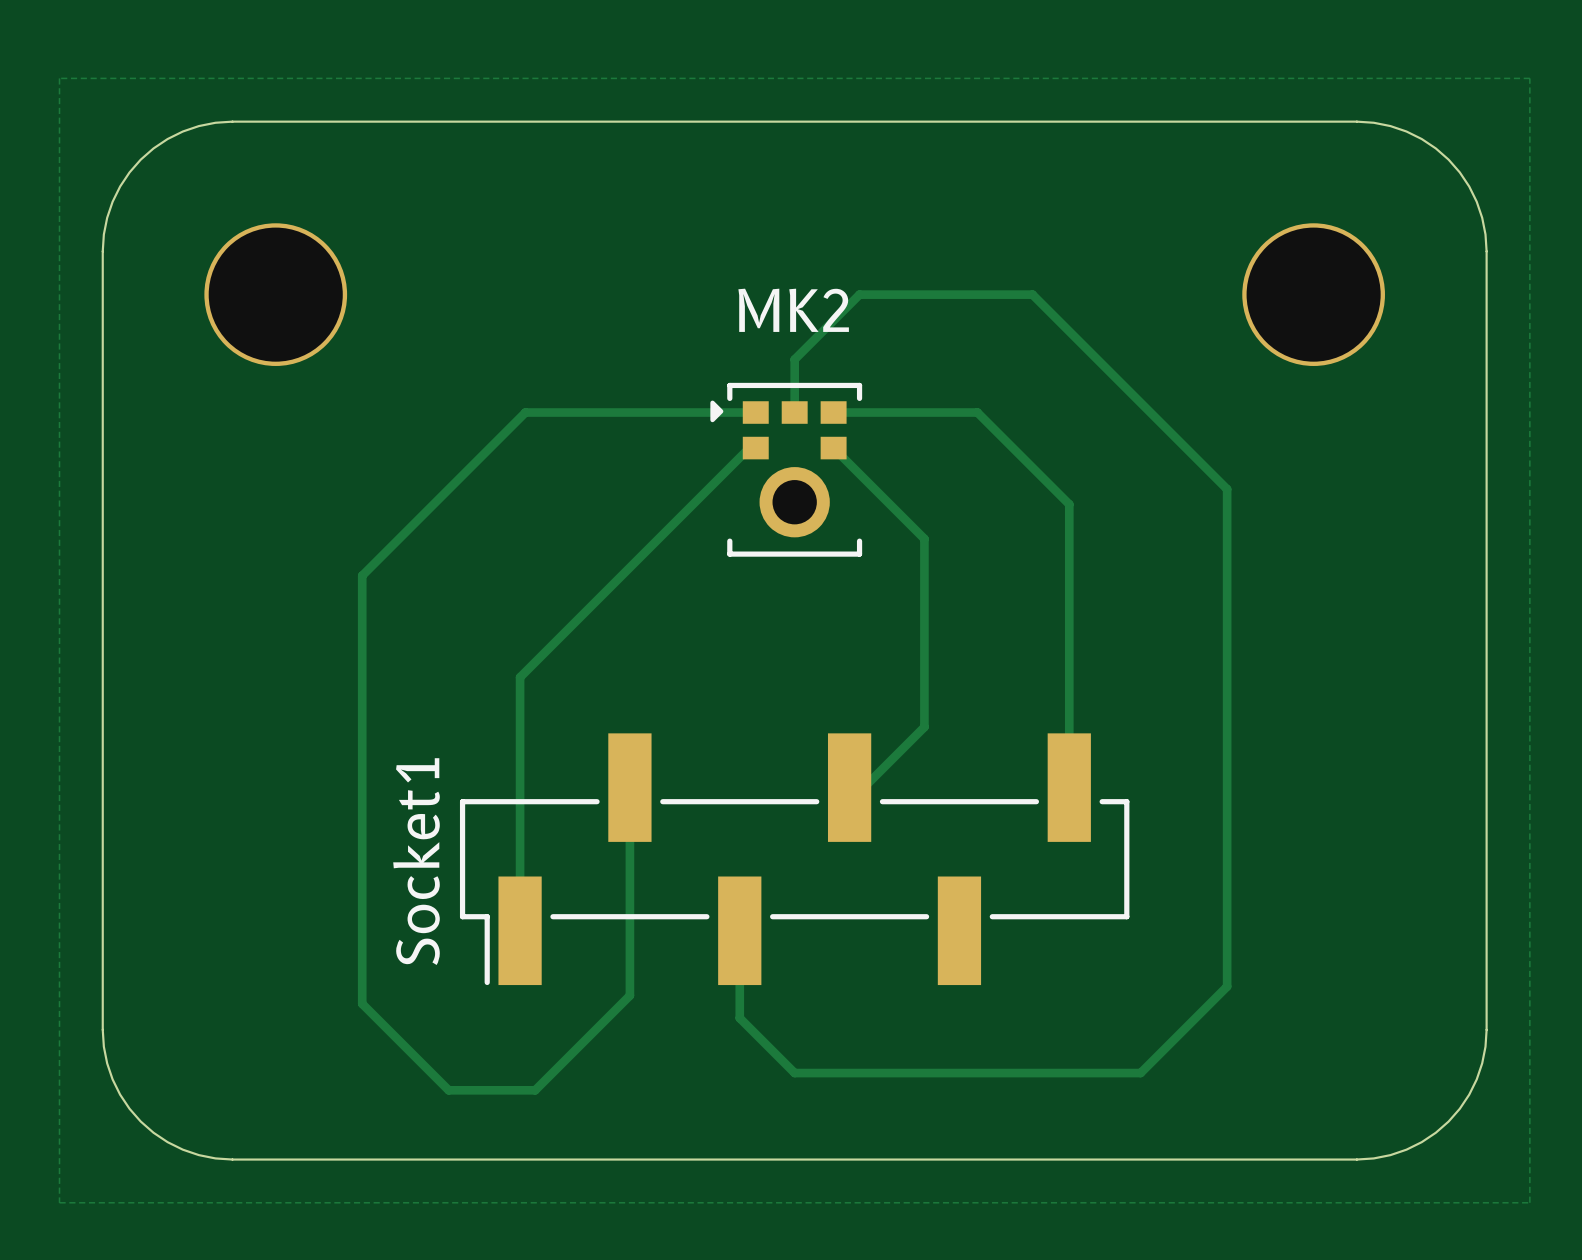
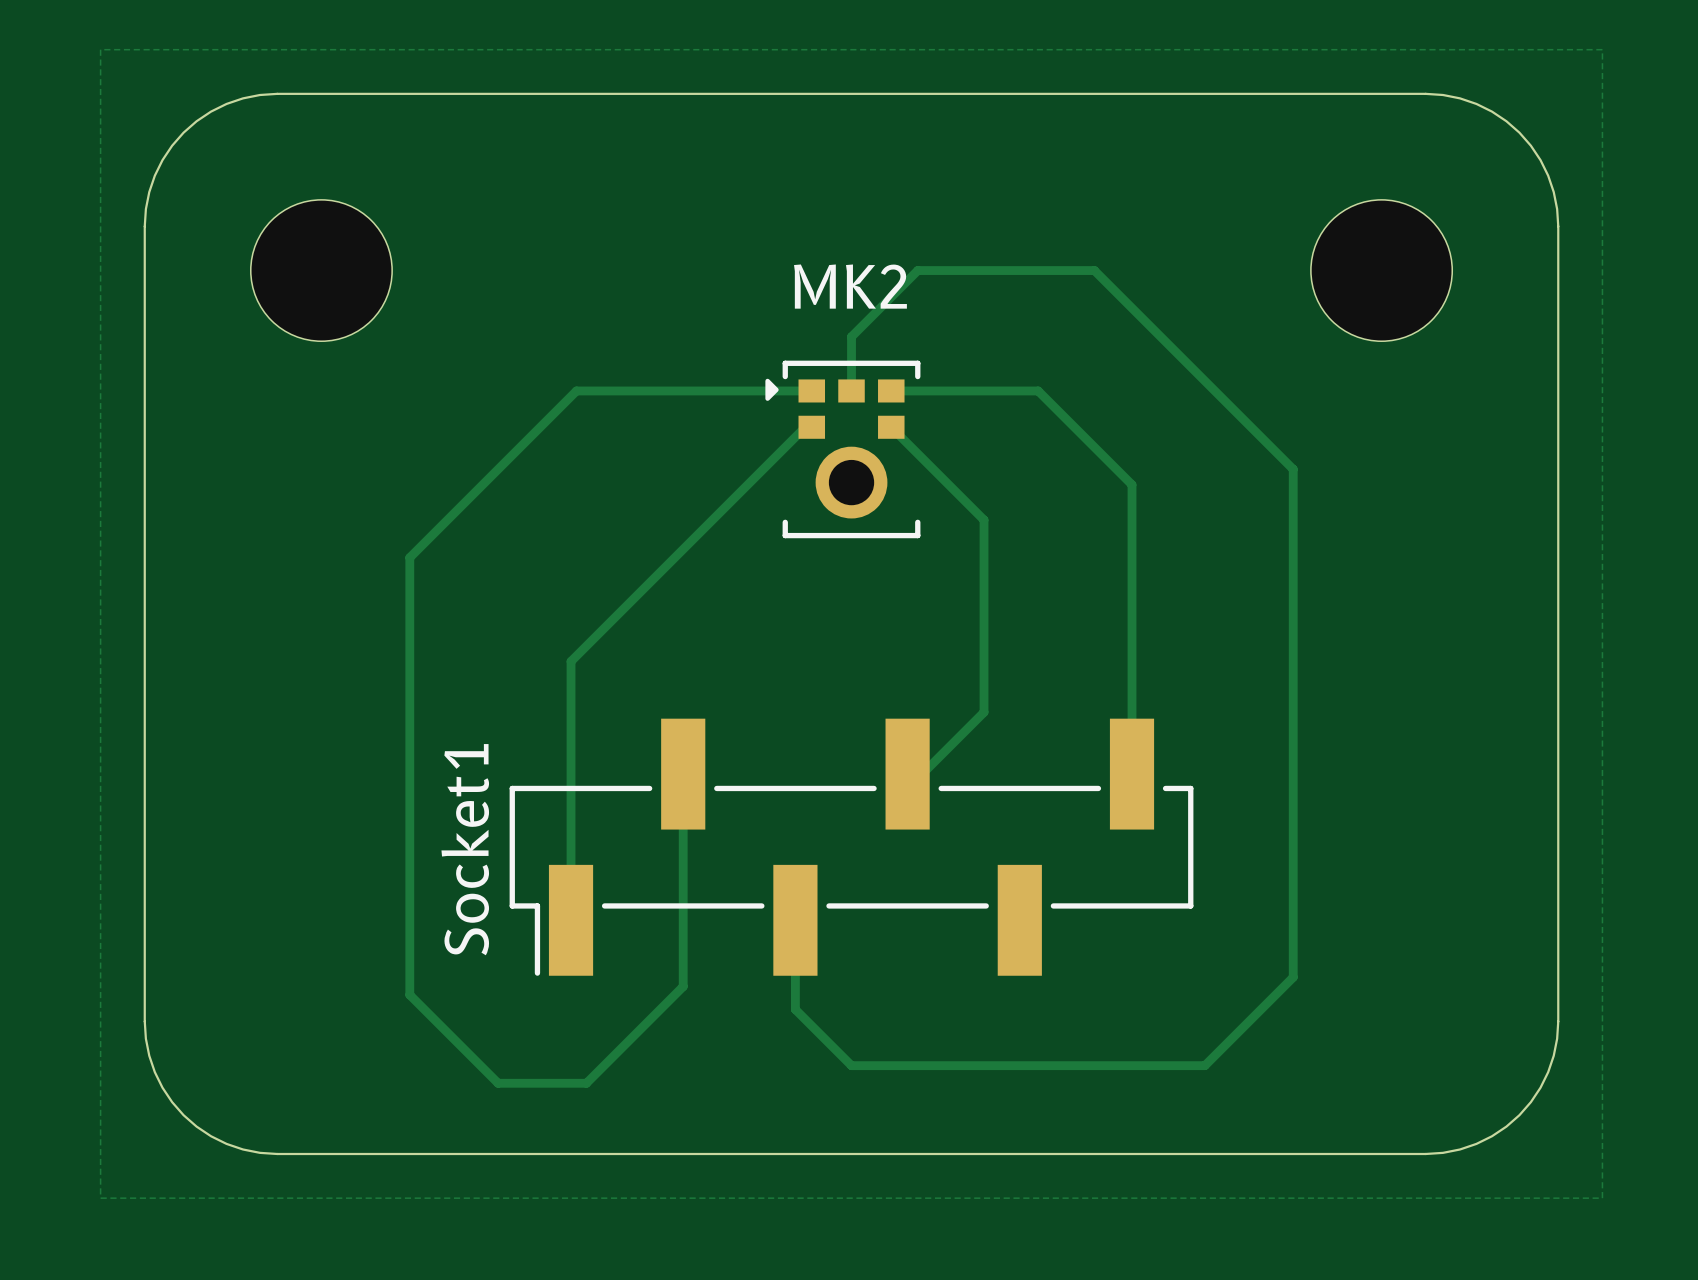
part footprint: [204, 223, 348, 366] -> [250, 199, 393, 342]
part footprint: [1242, 223, 1385, 366] -> [1310, 199, 1453, 342]

